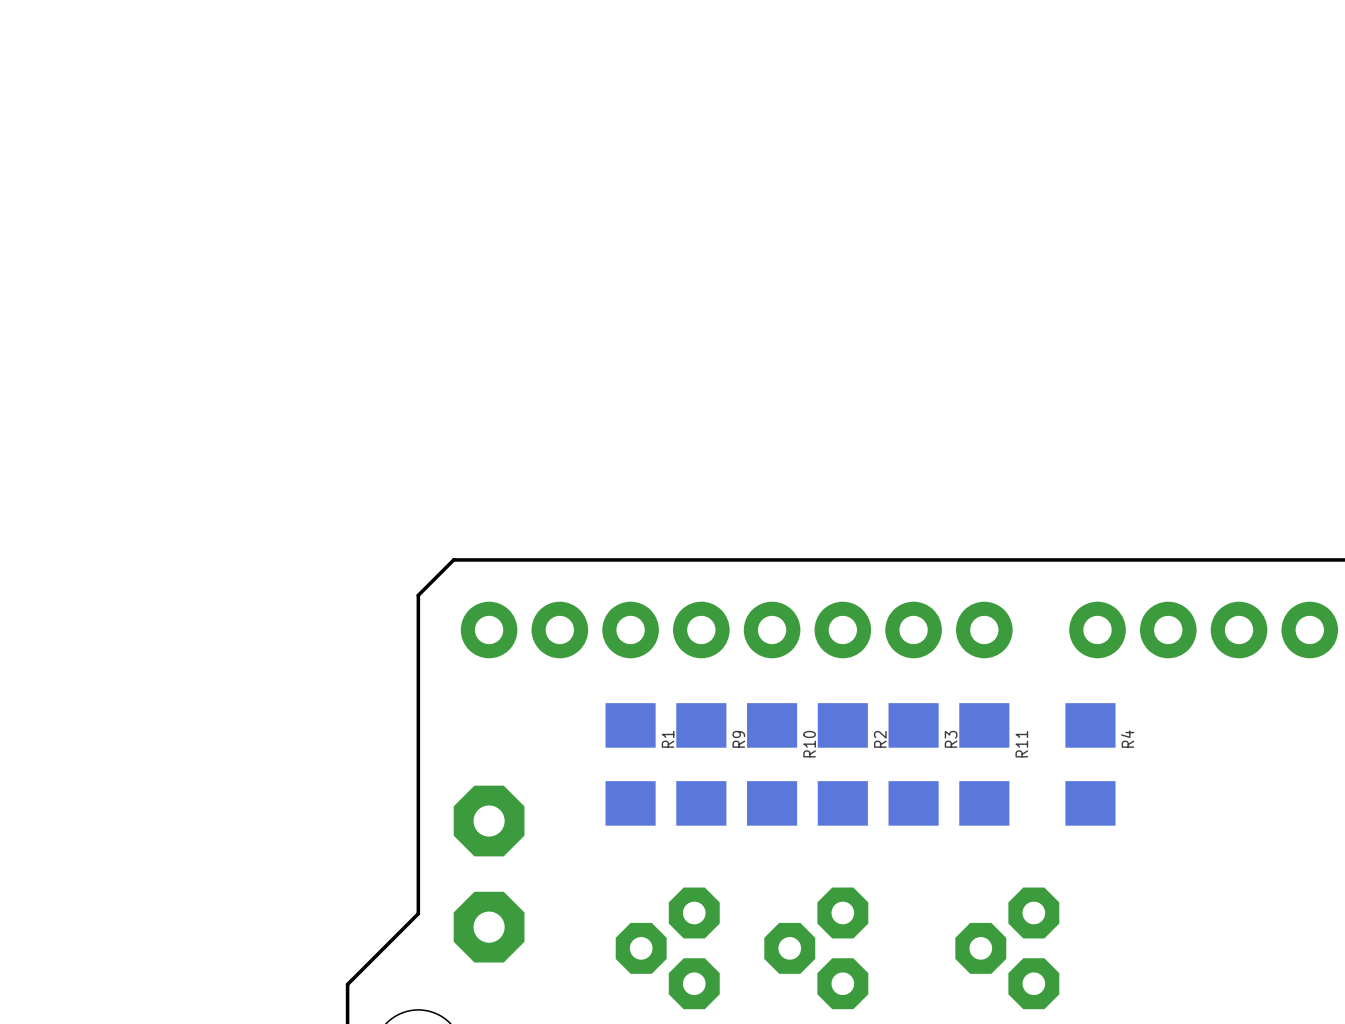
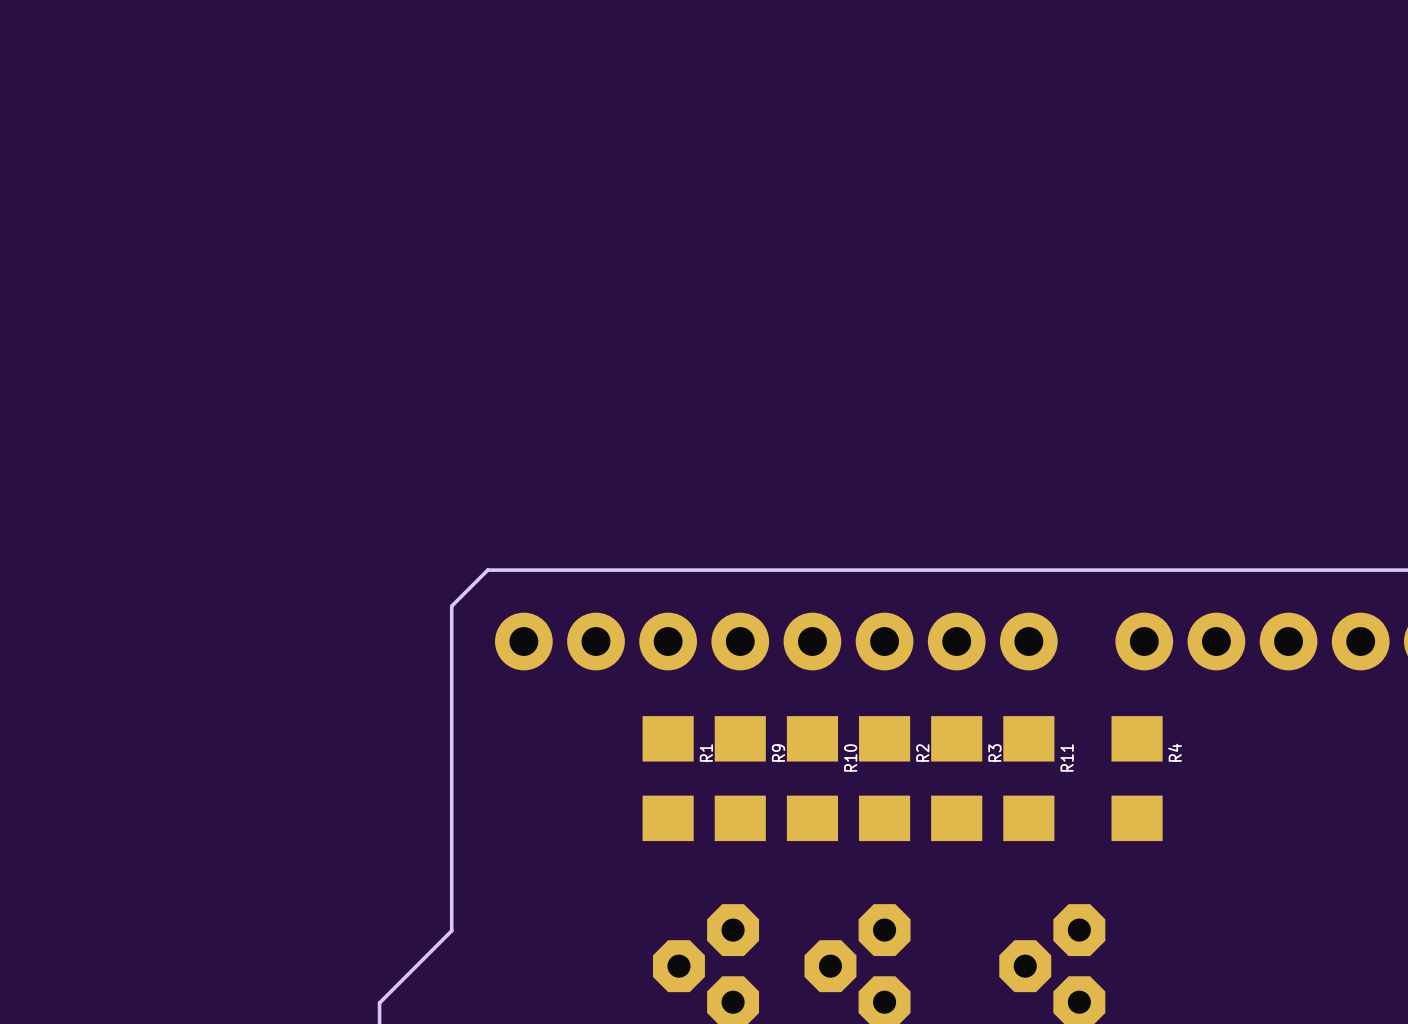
part: (489, 821) -> none
part: (489, 927) -> none

